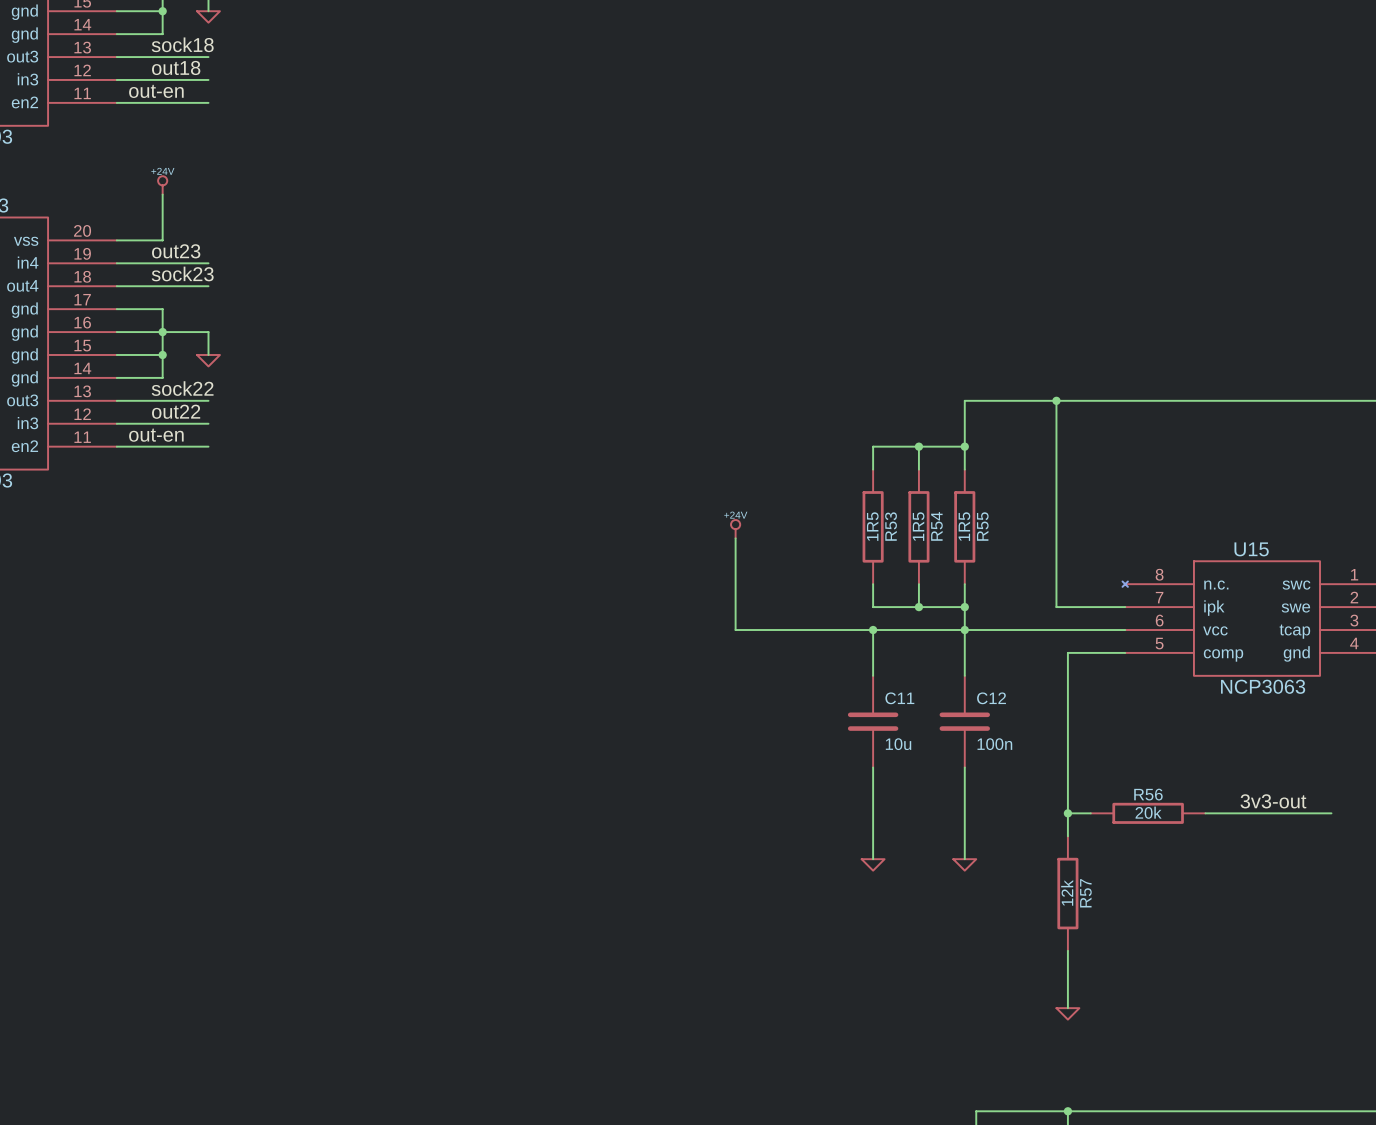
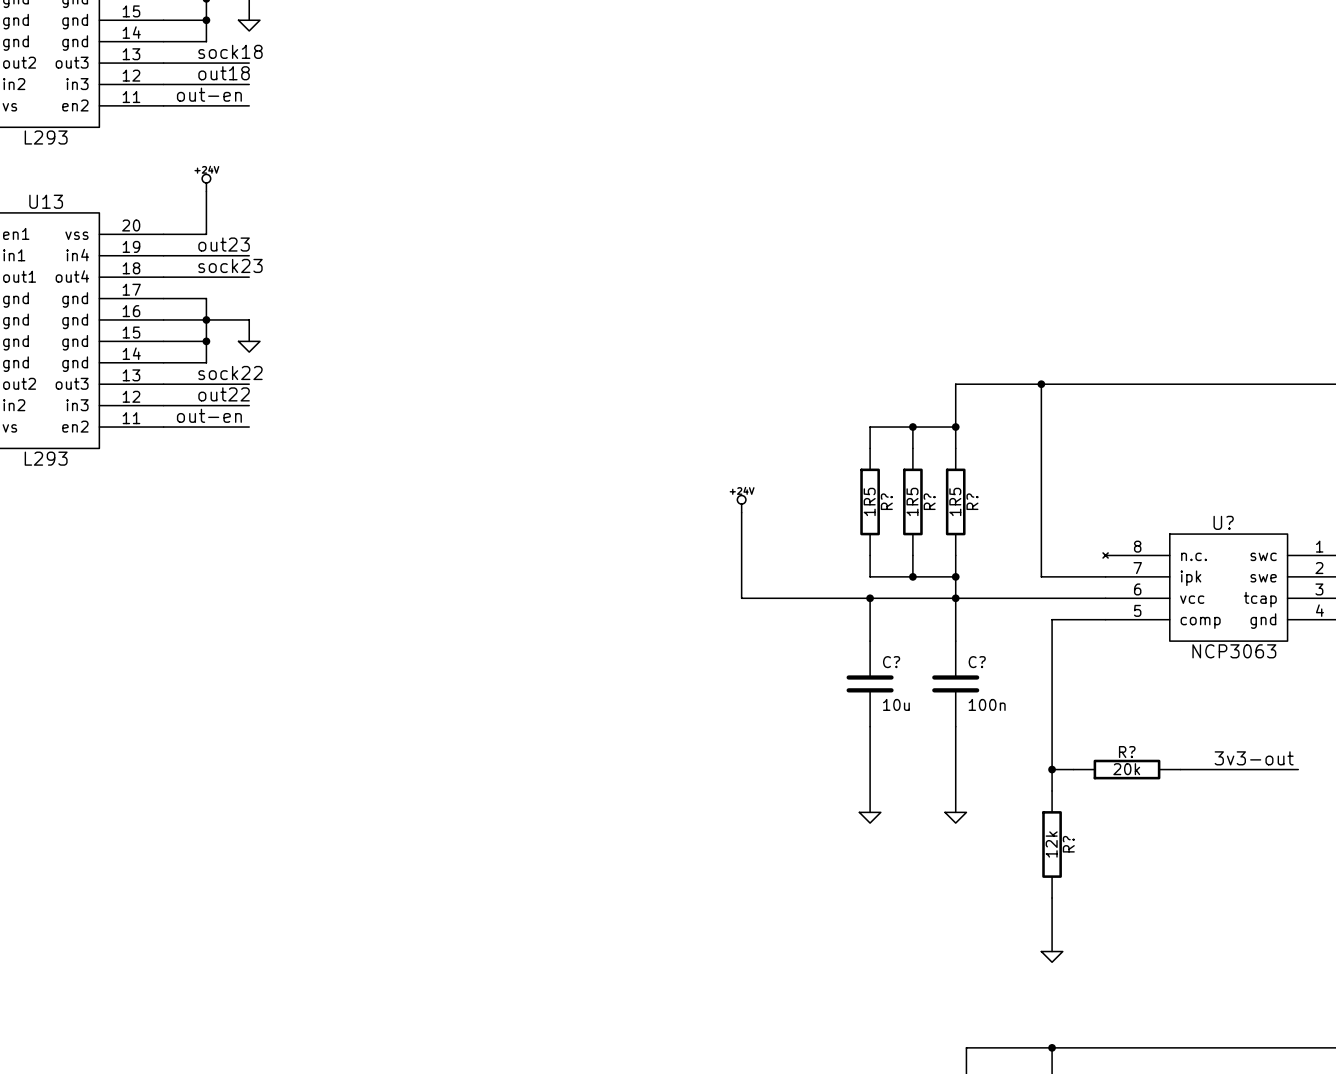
R53 name: R53 (891, 526) -> R? (886, 501)
R54 name: R54 (936, 526) -> R? (929, 501)
R55 name: R55 (982, 526) -> R? (972, 501)
U15 name: U15 (1251, 549) -> U? (1223, 522)
C11 name: C11 (899, 698) -> C? (891, 662)
C12 name: C12 (991, 698) -> C? (977, 662)
R56 name: R56 (1148, 794) -> R? (1127, 752)
R57 name: R57 (1085, 893) -> R? (1068, 844)

